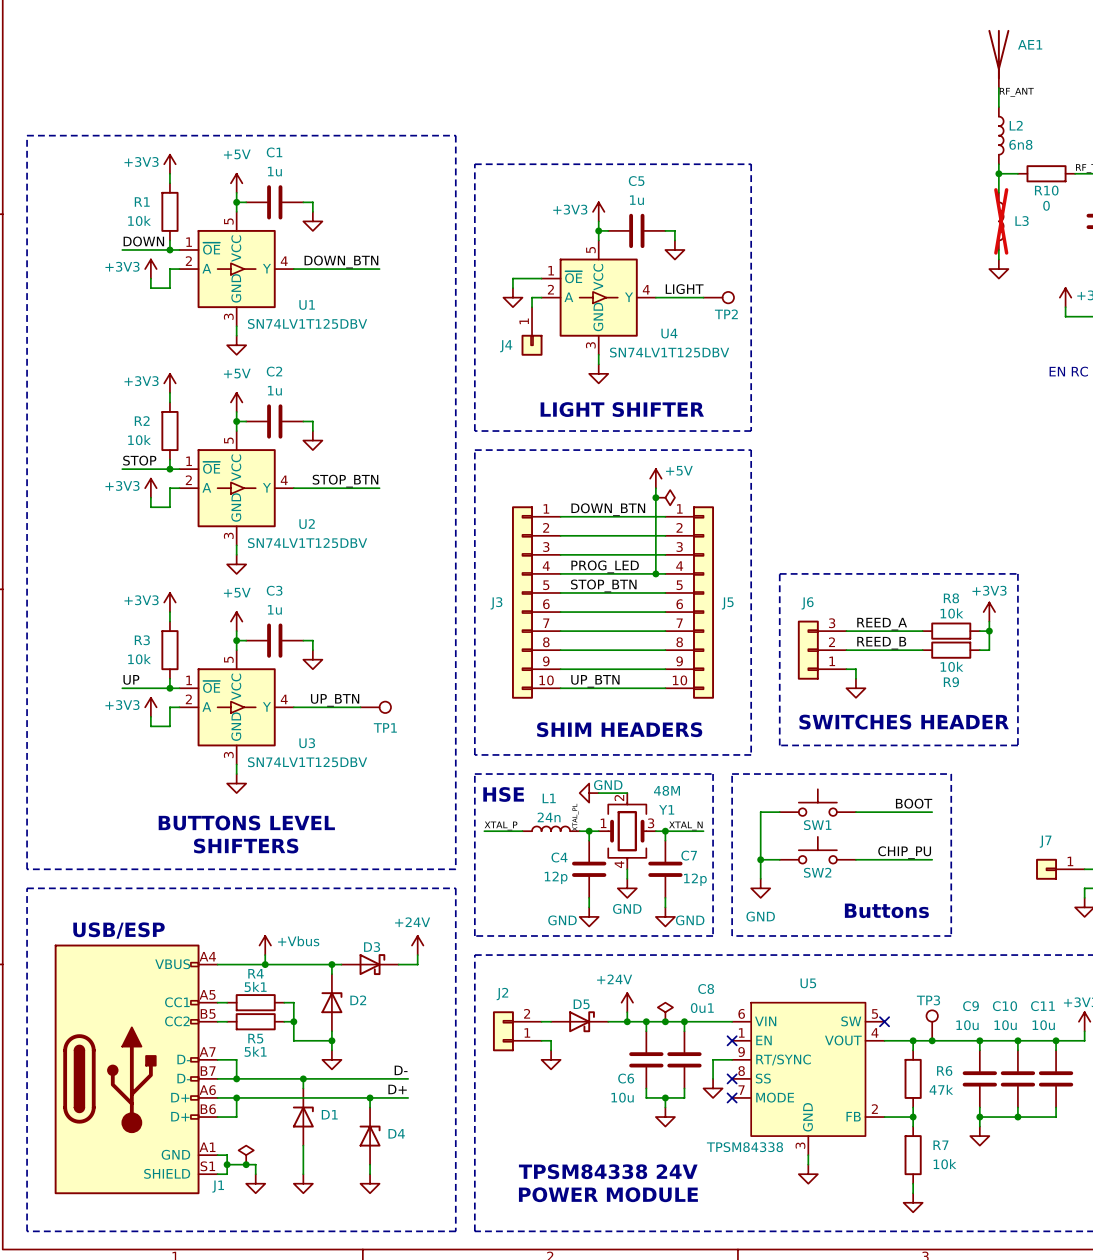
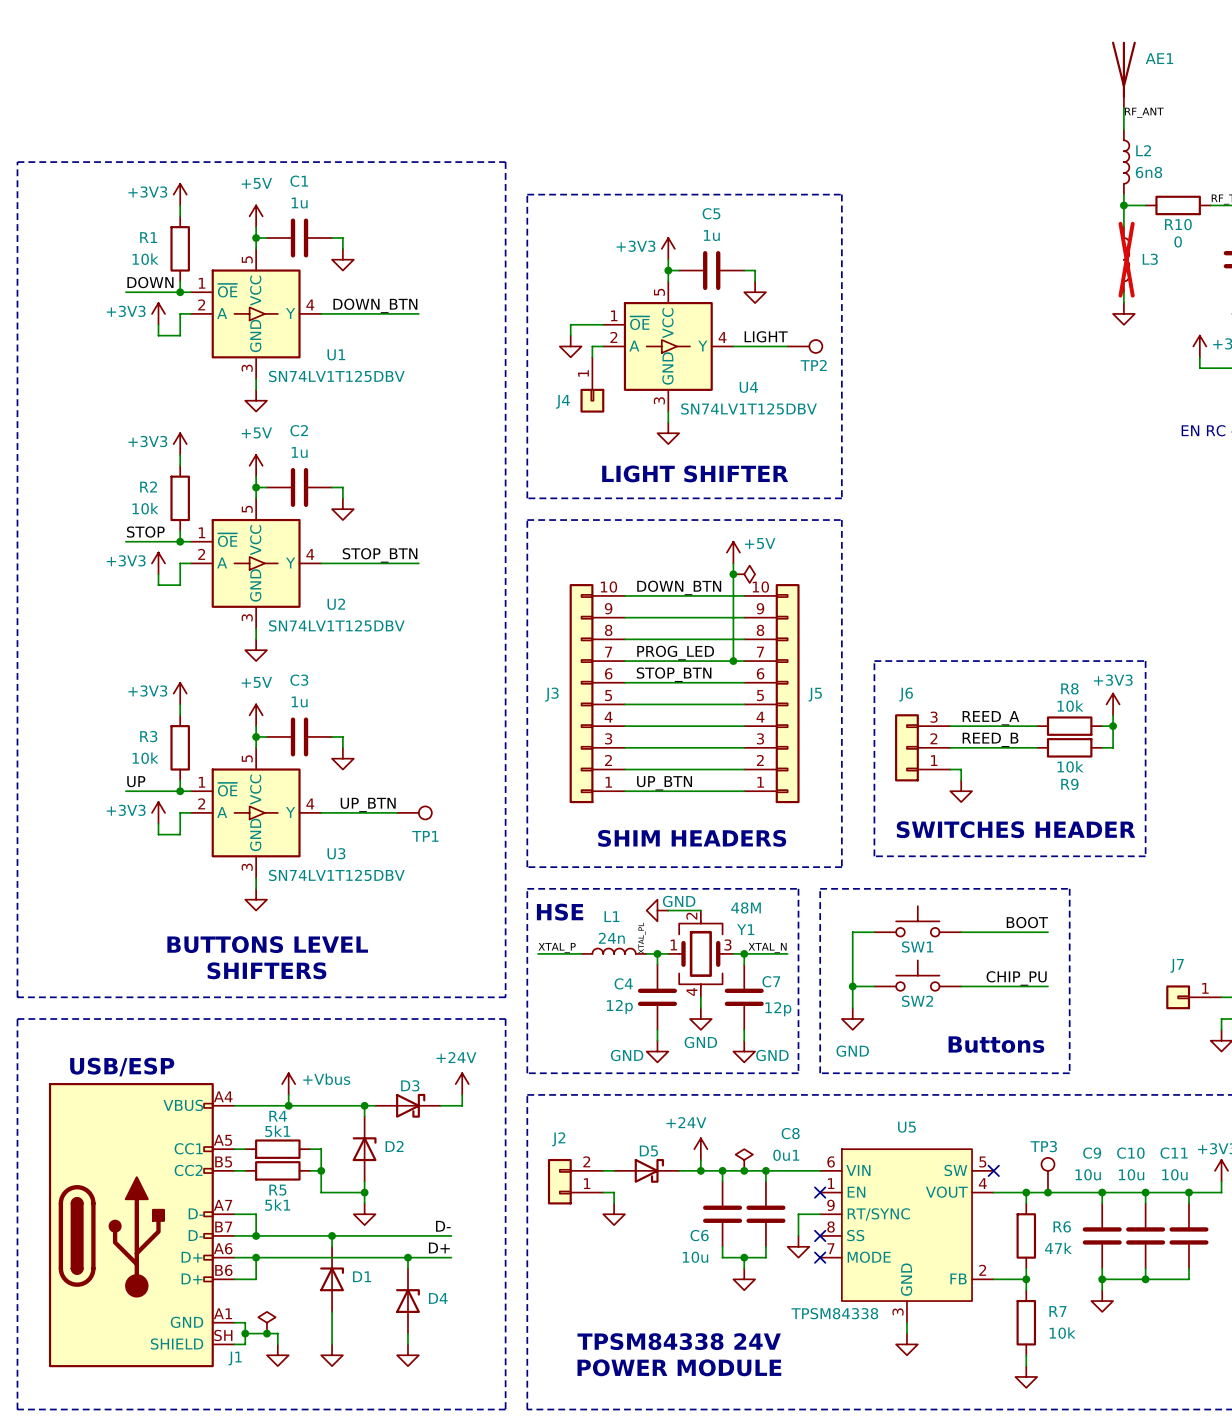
J3 flip: as is (522, 602) -> up-down (581, 693)
J5 flip: as is (703, 602) -> up-down (787, 693)
J1 pin number: S1 (207, 1166) -> SH (223, 1335)

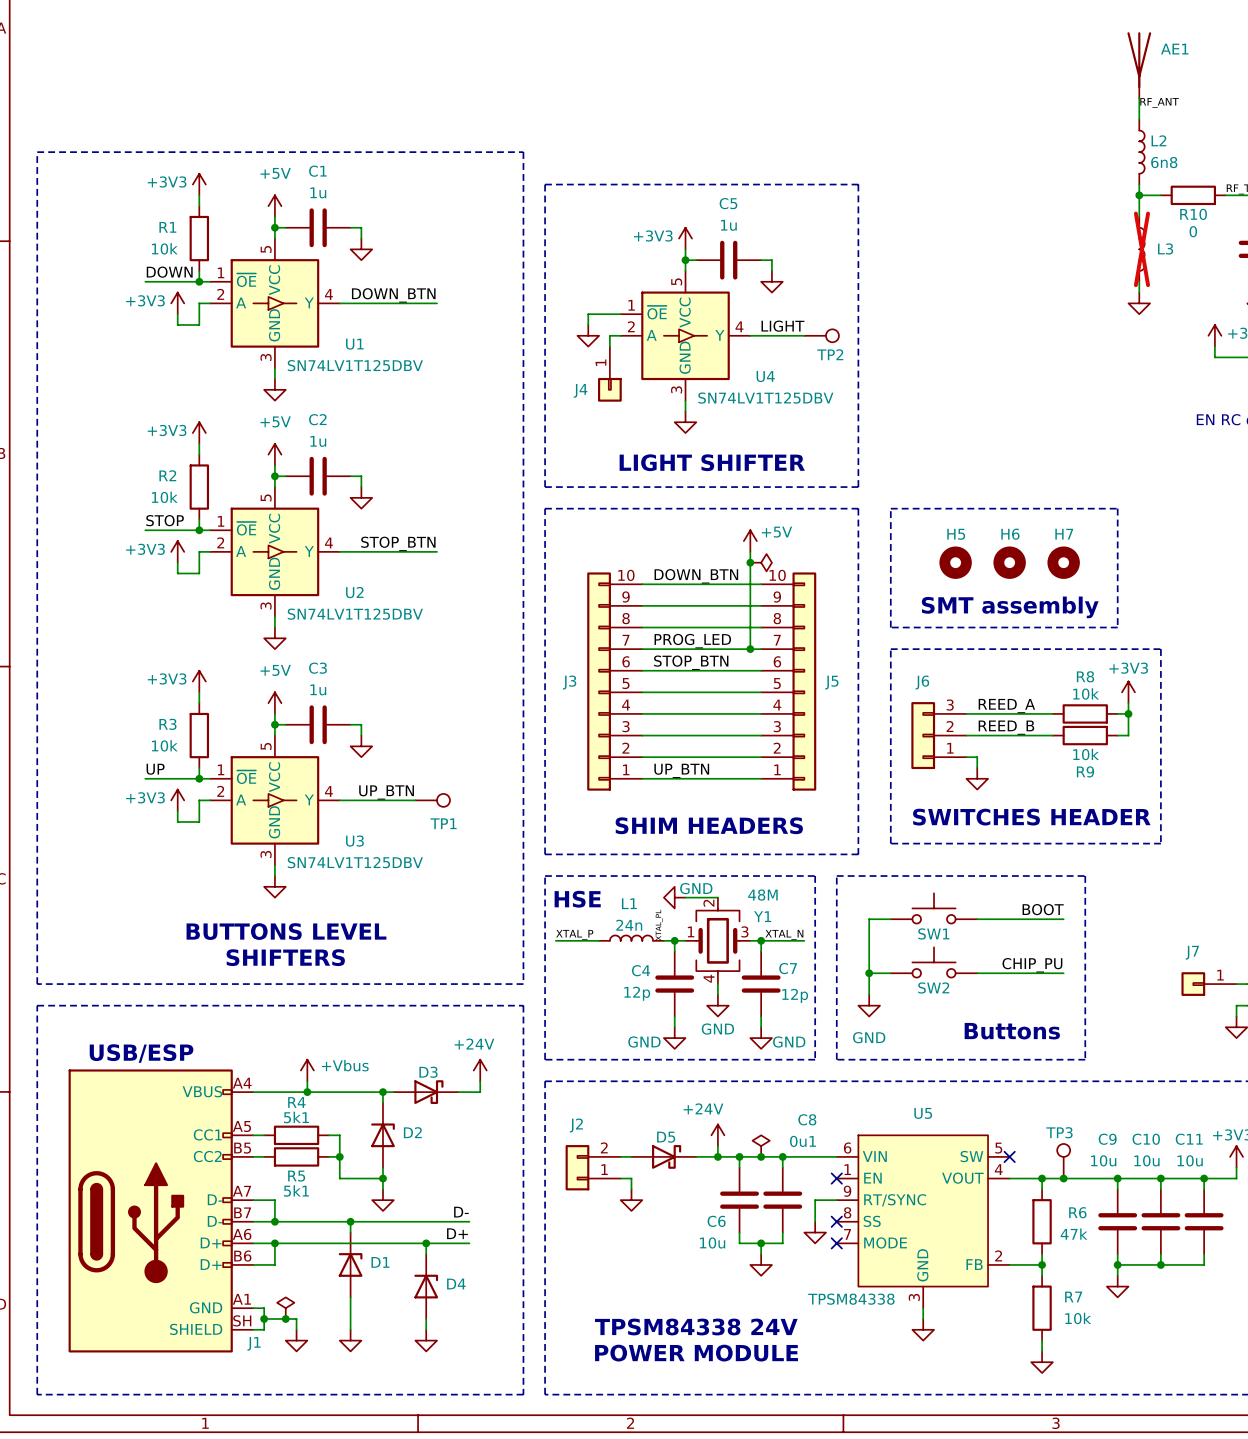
line: none -> (890, 508) (1117, 508) (1117, 627) (890, 627) (890, 508)
H5: none -> (955, 562)
H6: none -> (1009, 562)
H7: none -> (1063, 562)
text: none -> SMT assembly (1010, 607)

